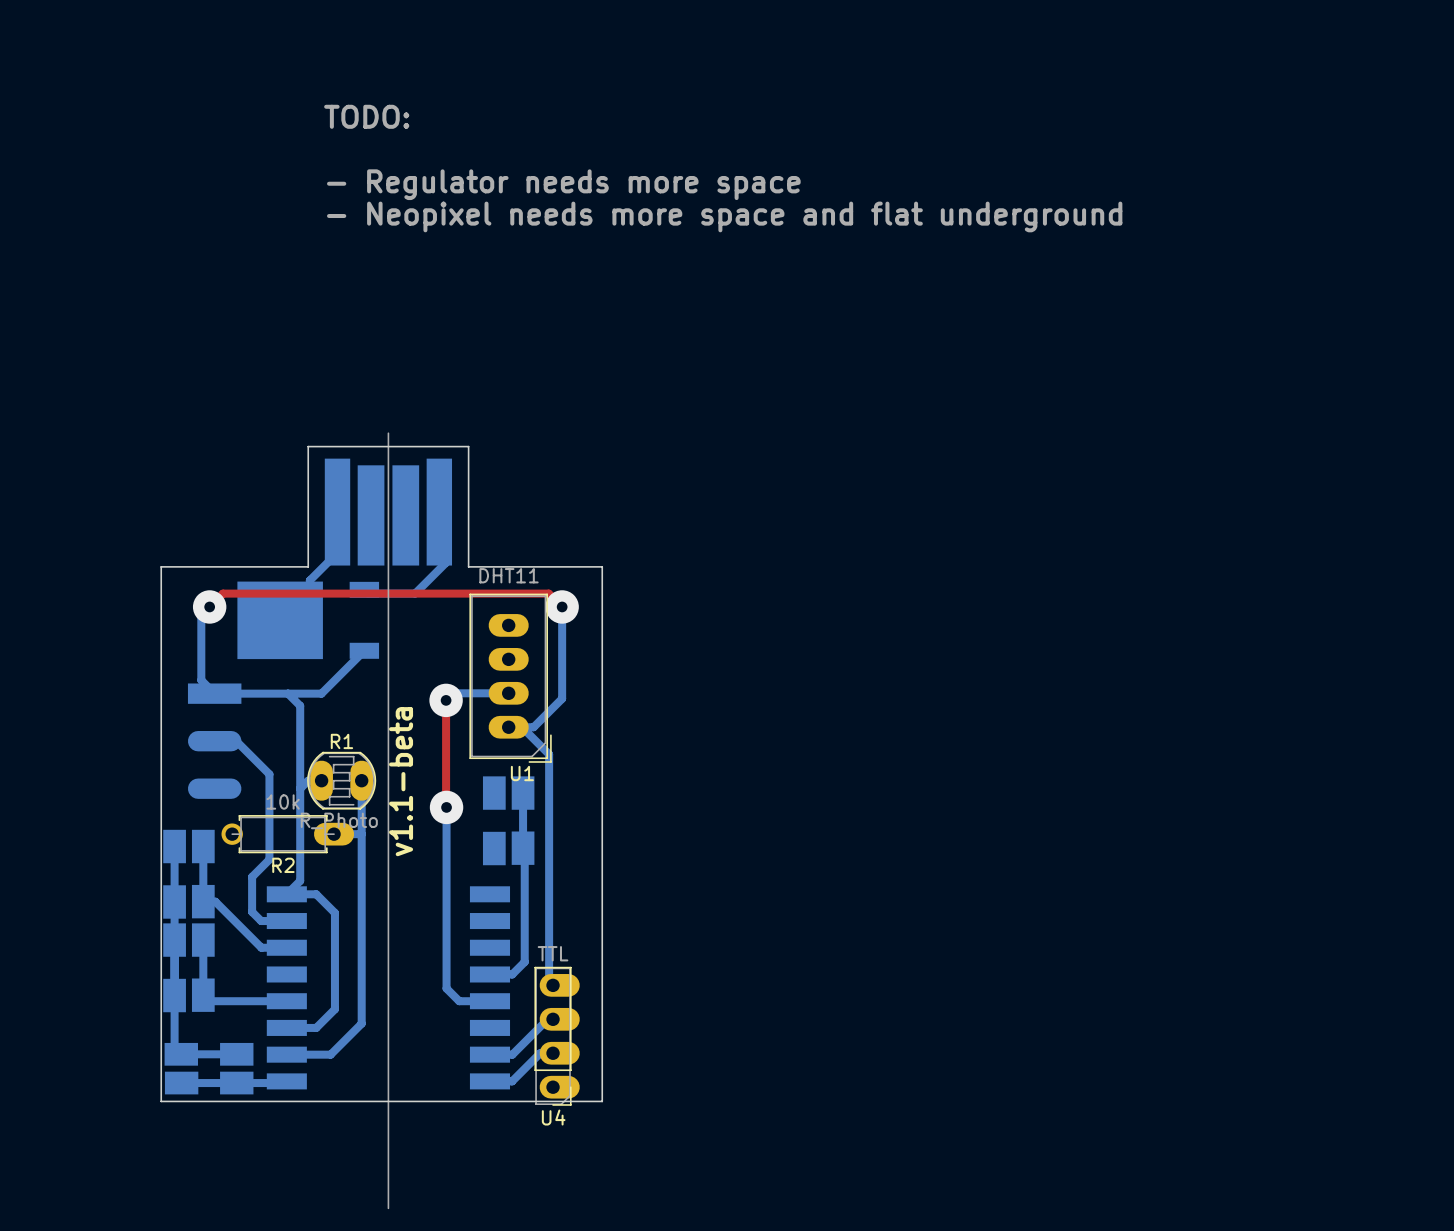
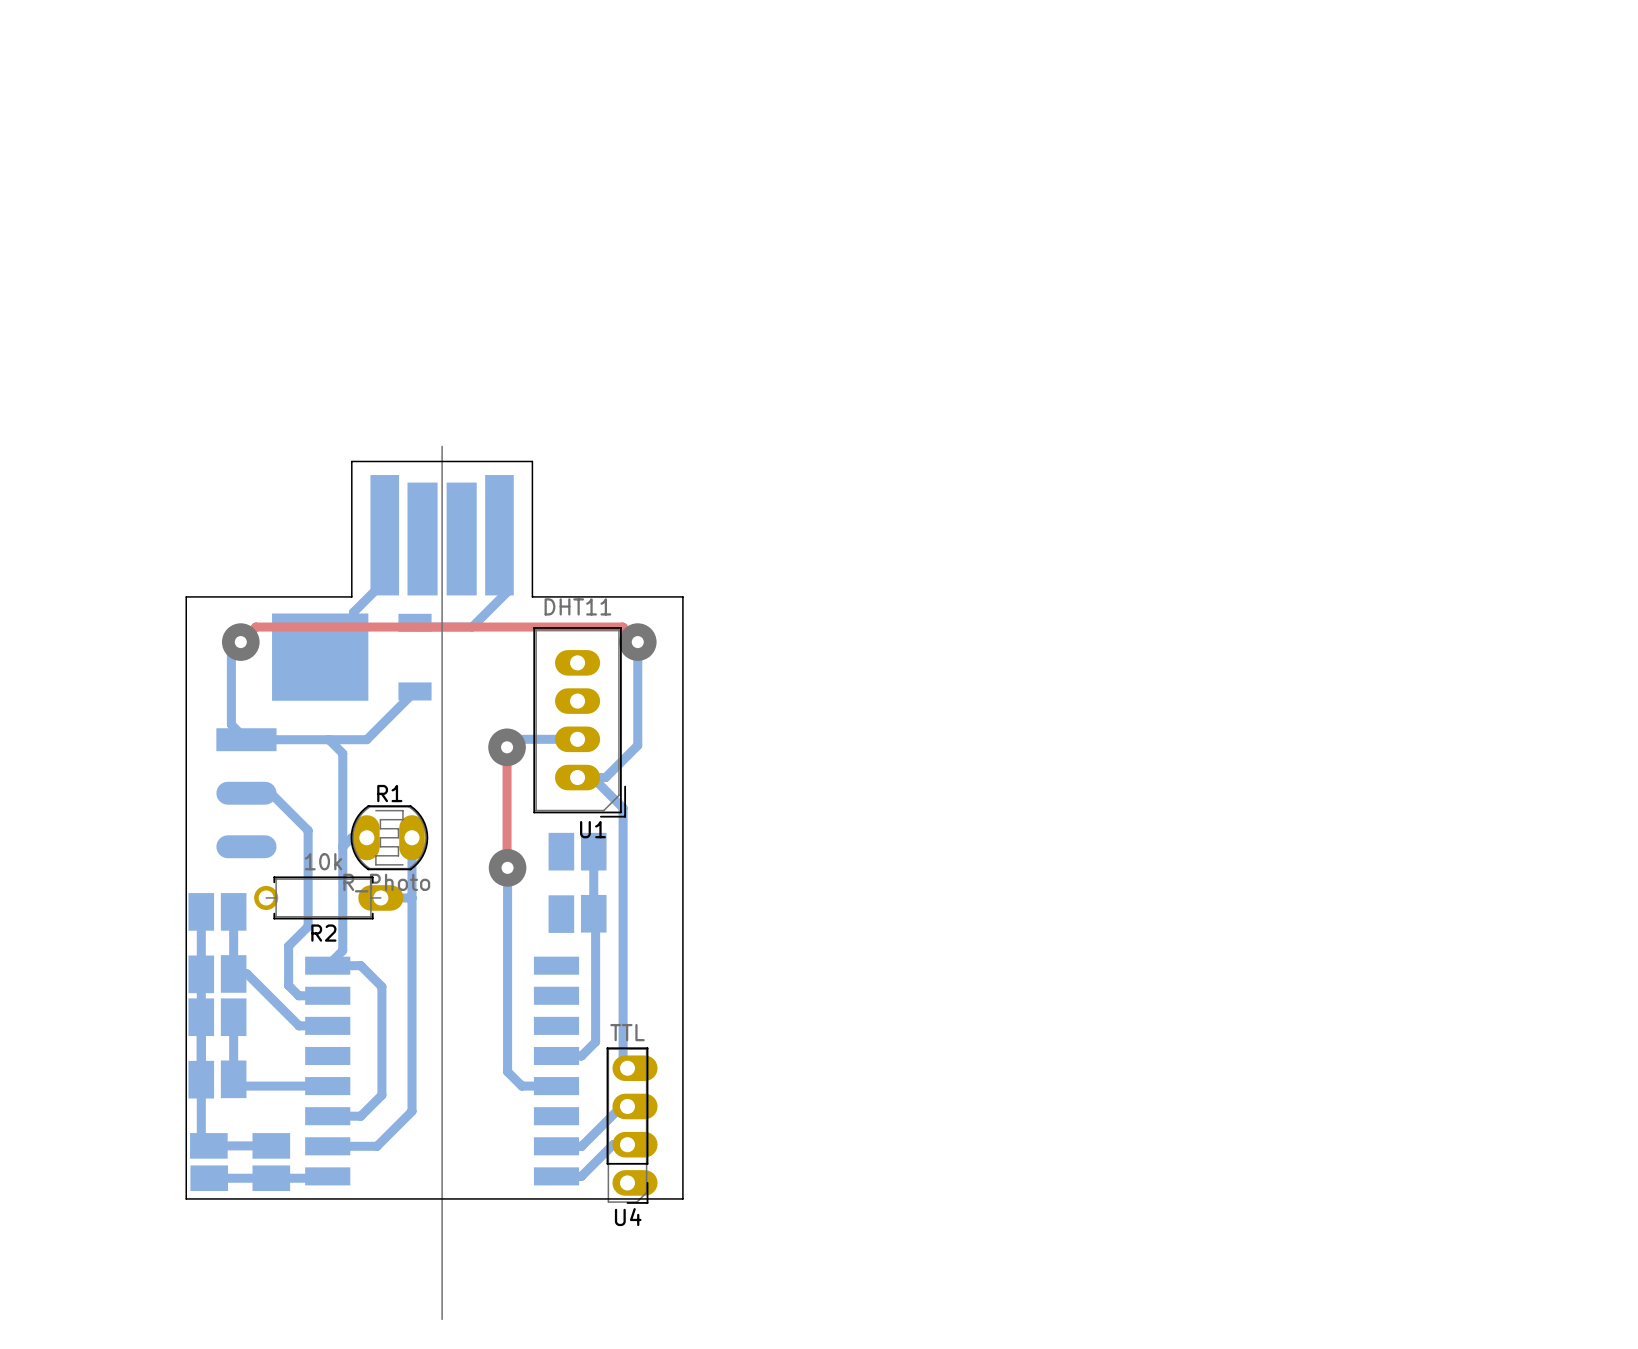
text: TODO: (366, 116) -> none
text: - Regulator needs more space (563, 184) -> none
text: - Neopixel needs more space and flat underground (724, 216) -> none
text: v1.1-beta (401, 781) -> none

